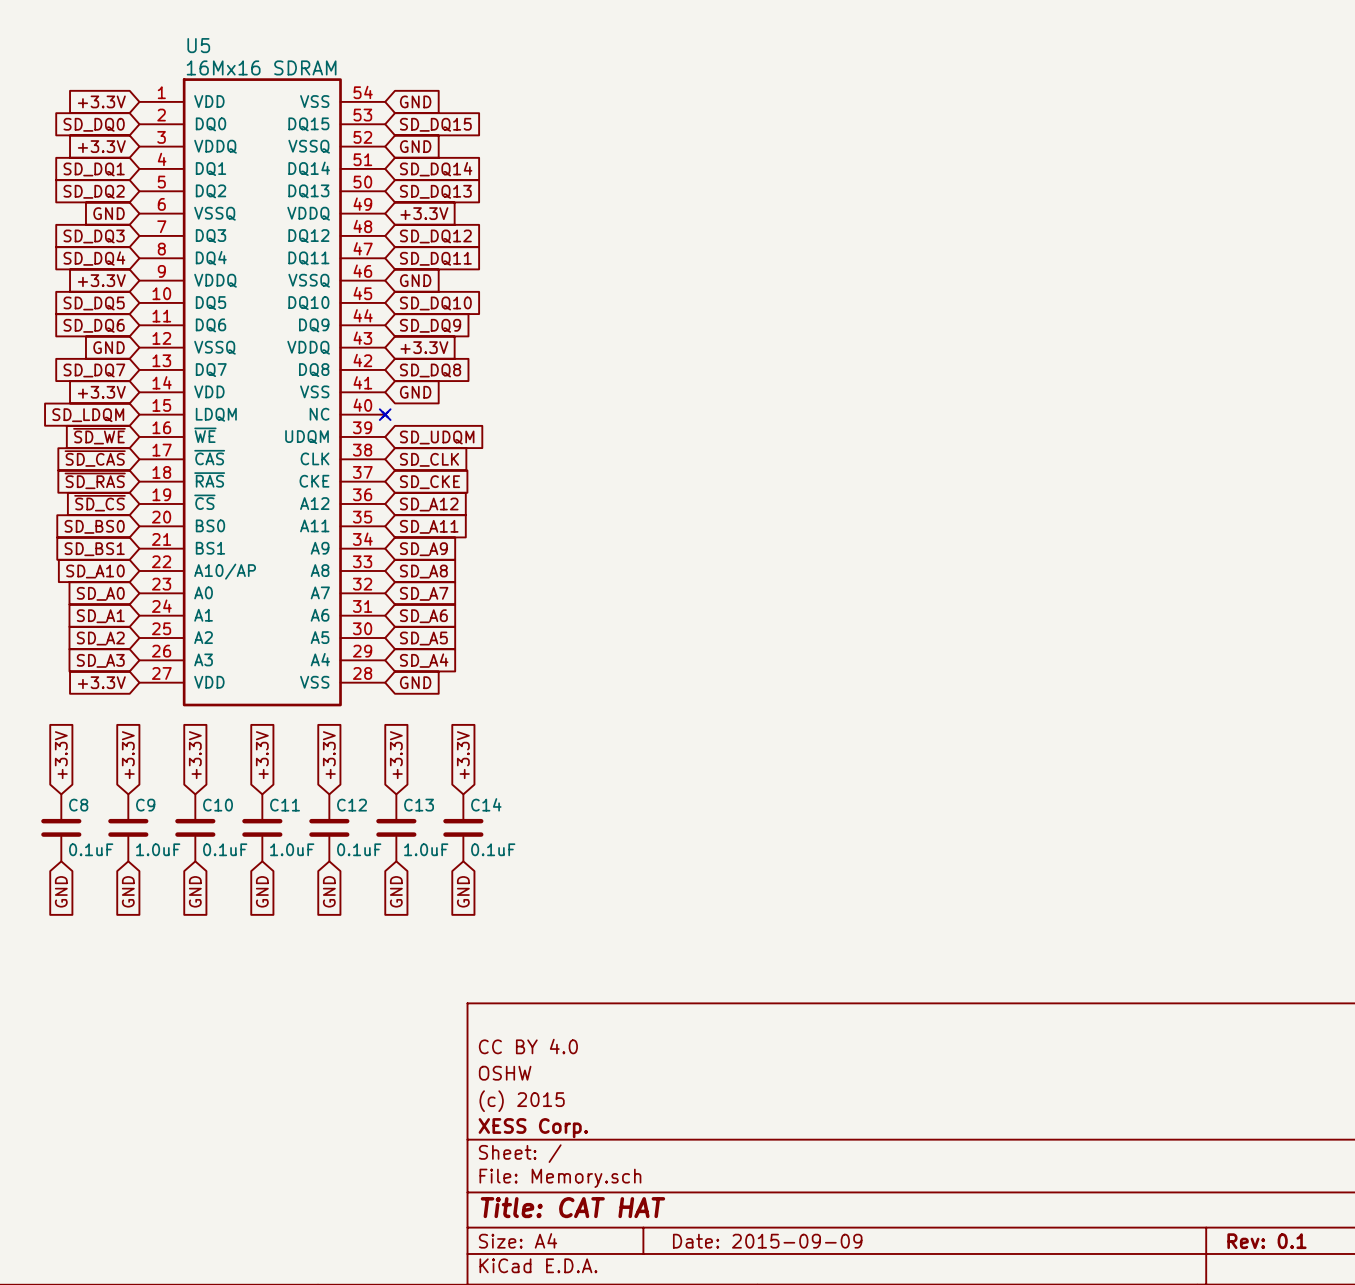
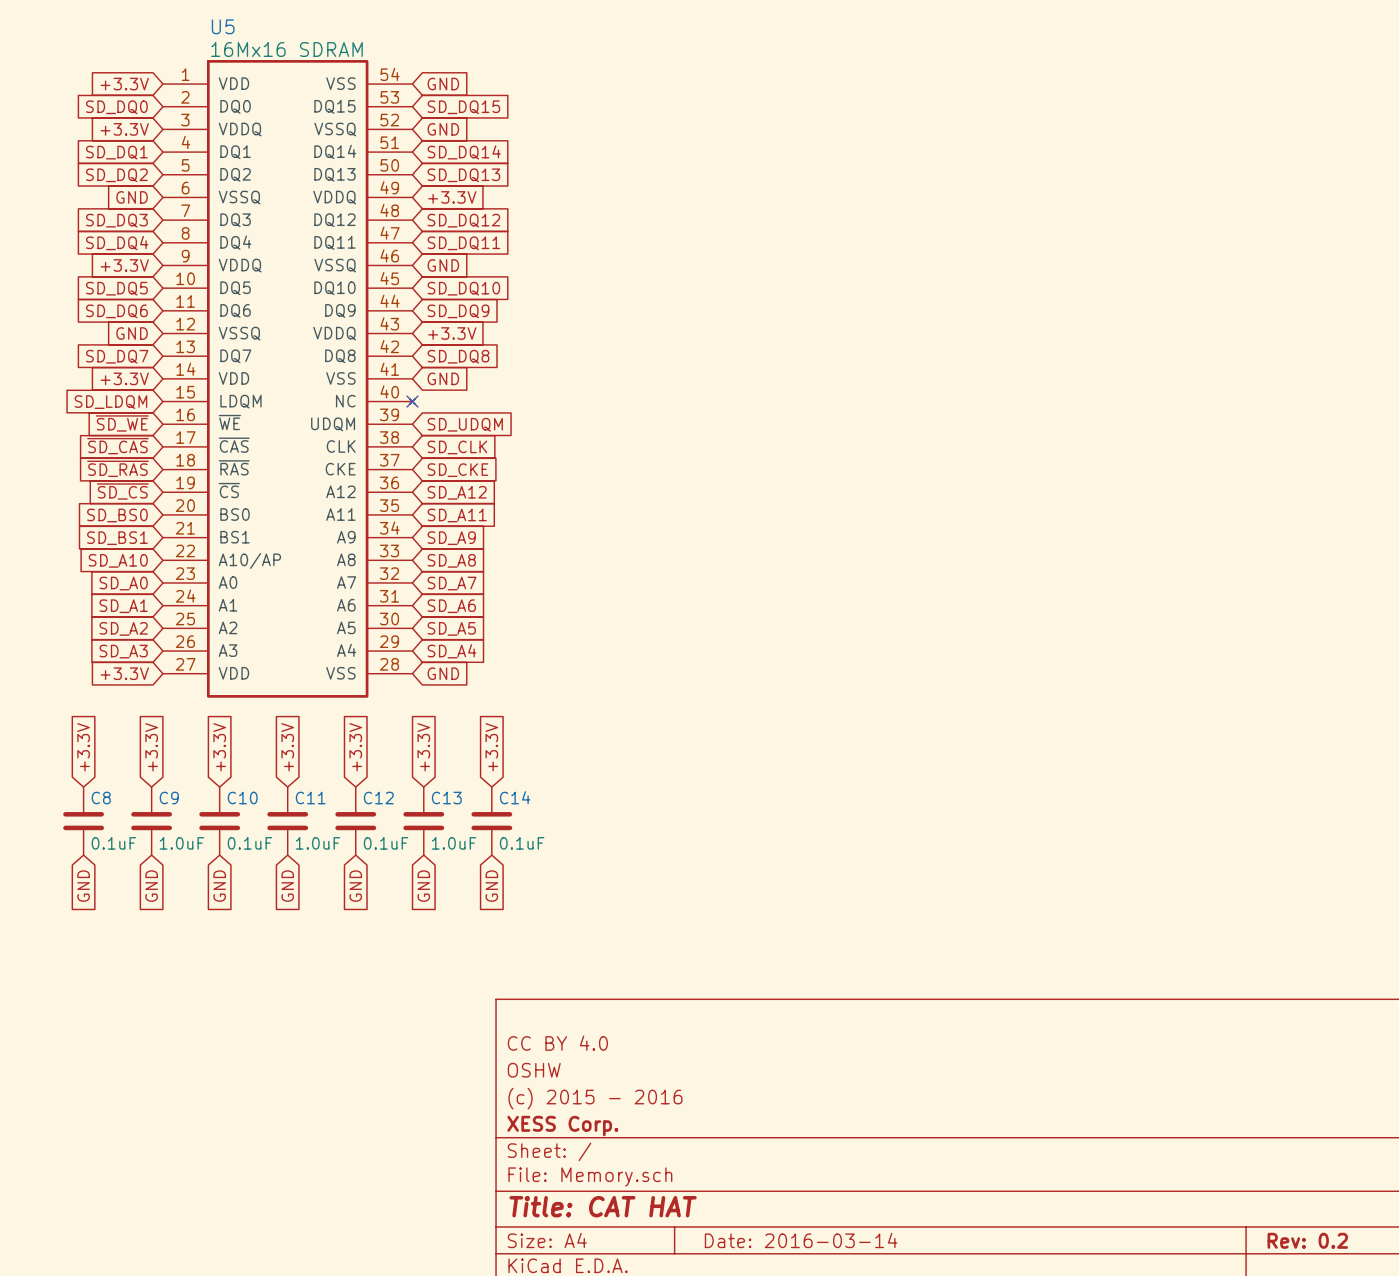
title block: (c) 2015 (522, 1101) -> (c) 2015 - 2016 (595, 1098)
title block: Date: 2015-09-09 (767, 1241) -> Date: 2016-03-14 (801, 1240)
title block: Rev: 0.1 (1266, 1241) -> Rev: 0.2 (1307, 1240)

